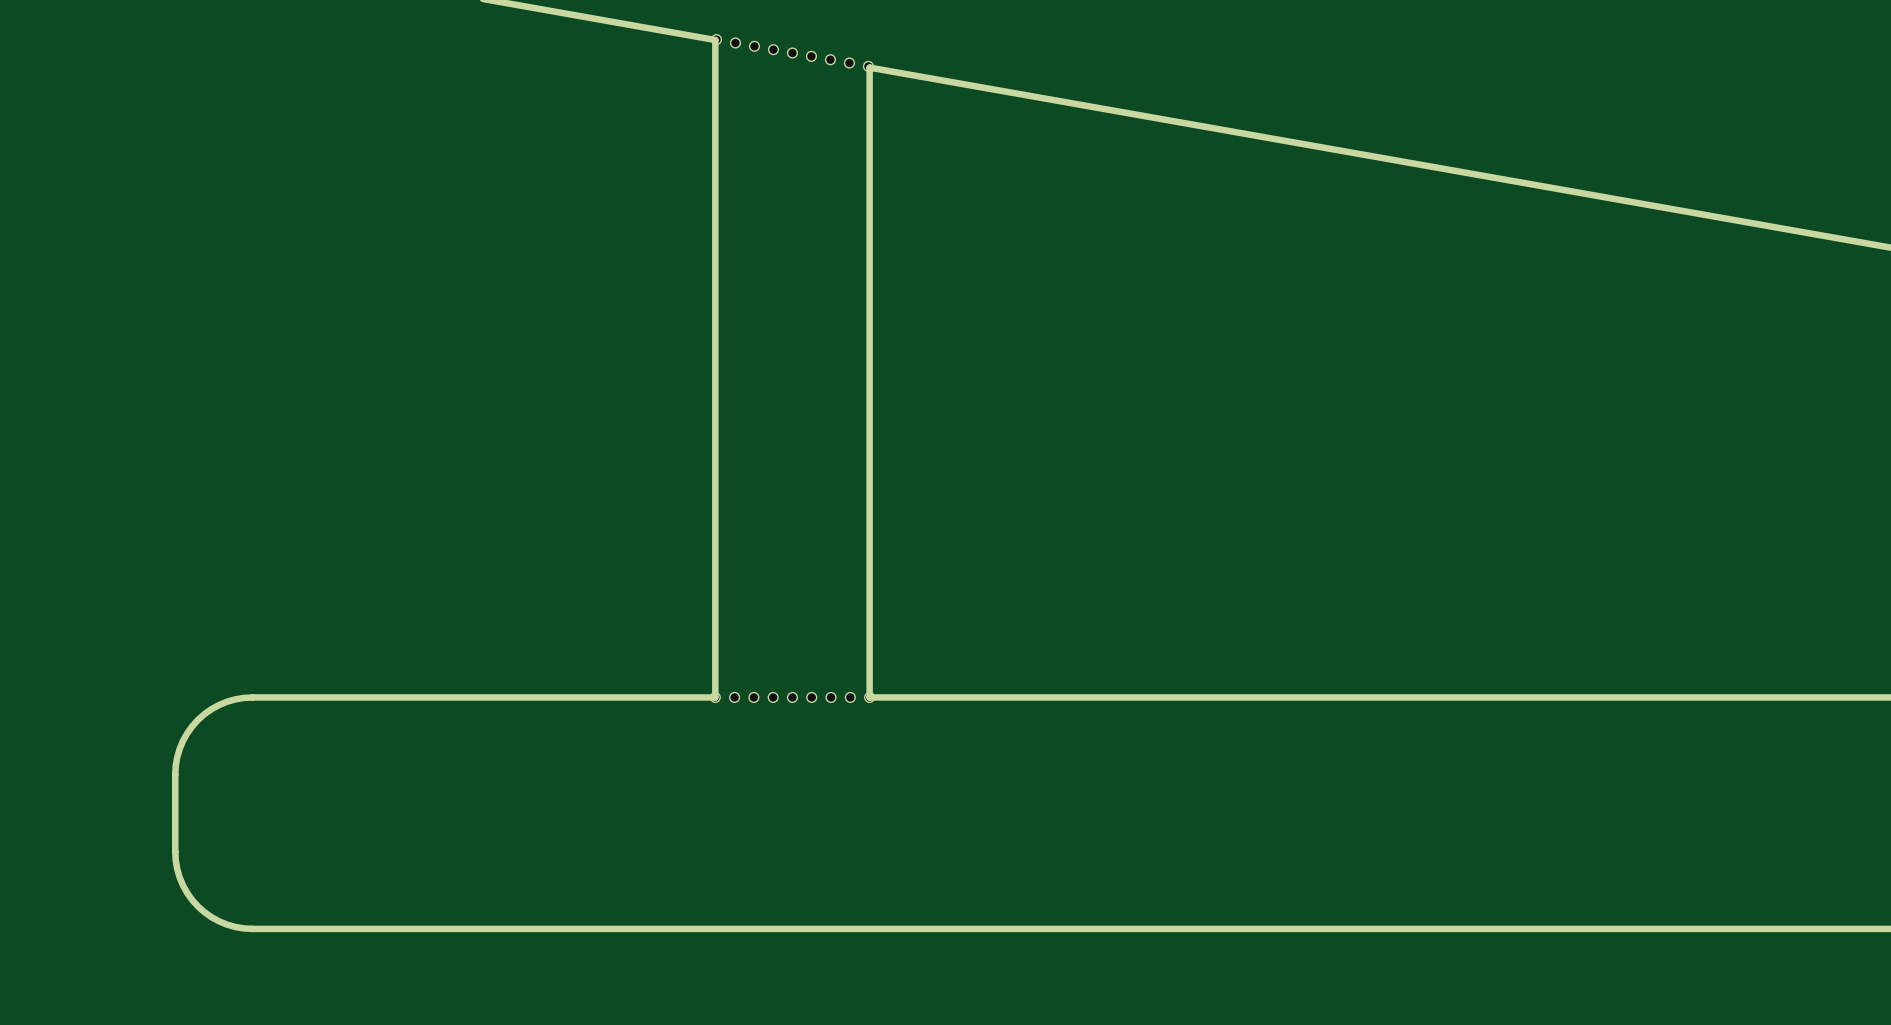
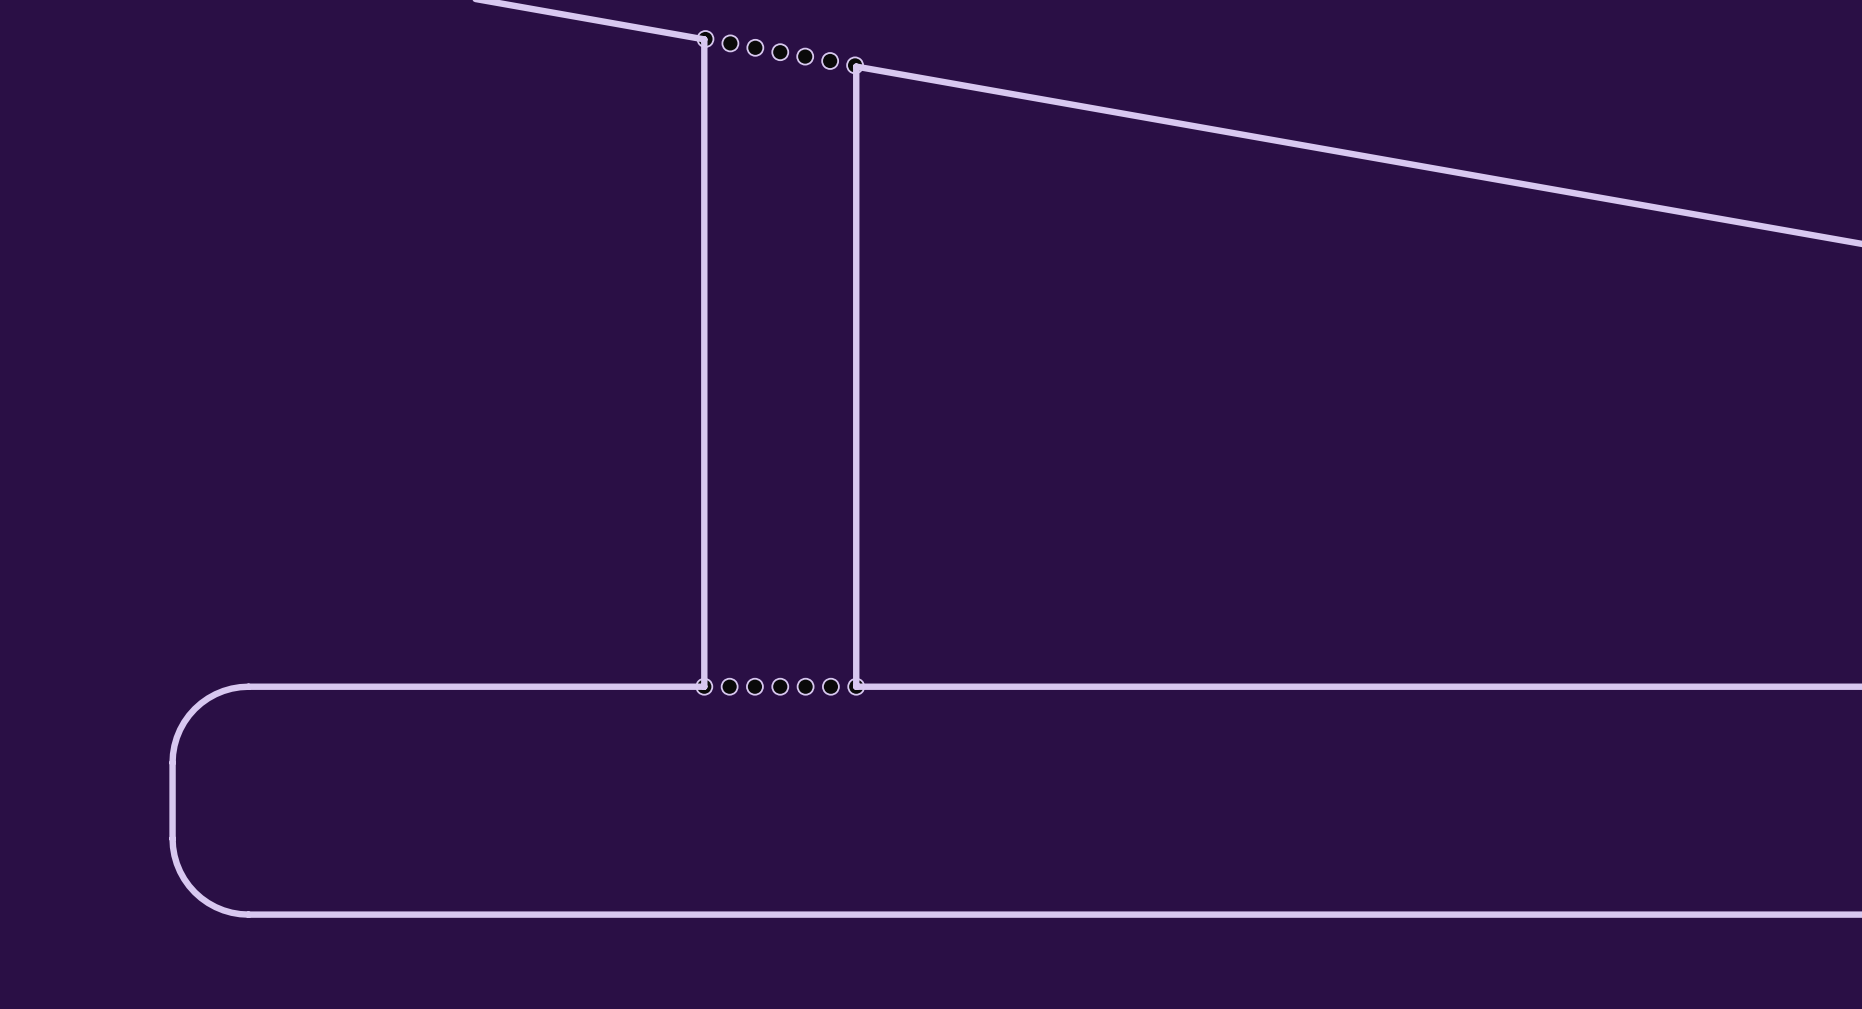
part footprint: [711, 34, 874, 72] -> [697, 31, 864, 74]
part footprint: [710, 692, 875, 703] -> [696, 678, 865, 695]

